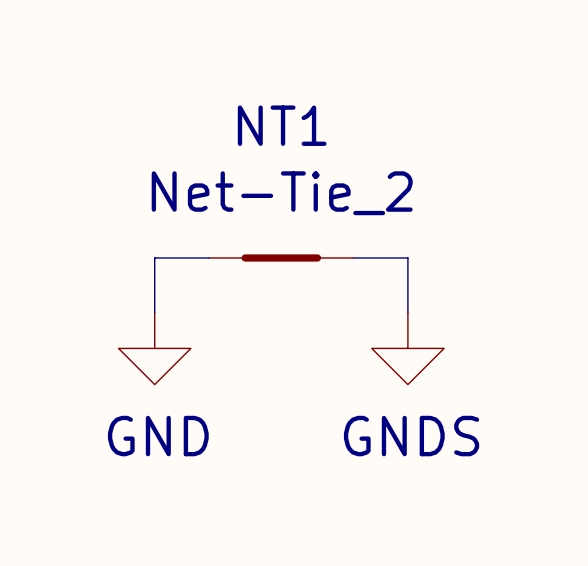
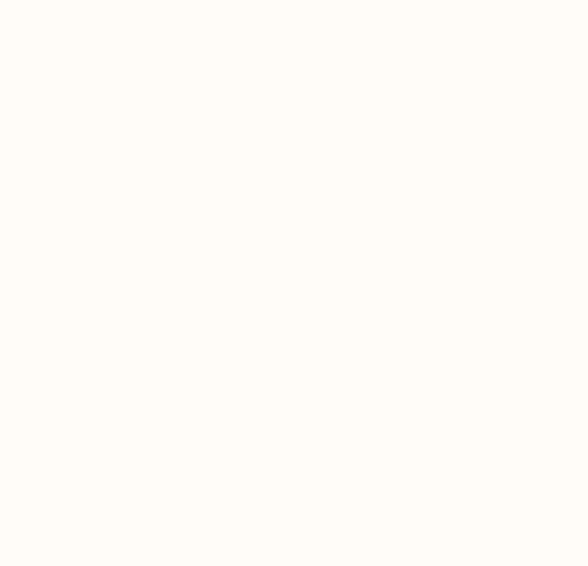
wire: (208, 257) (154, 257) (154, 312) -> none
NT1: Net-Tie_2 (281, 257) -> none
wire: (353, 257) (407, 257) (407, 312) -> none
power symbol: GND (154, 348) -> none
power symbol: GNDS (407, 348) -> none

